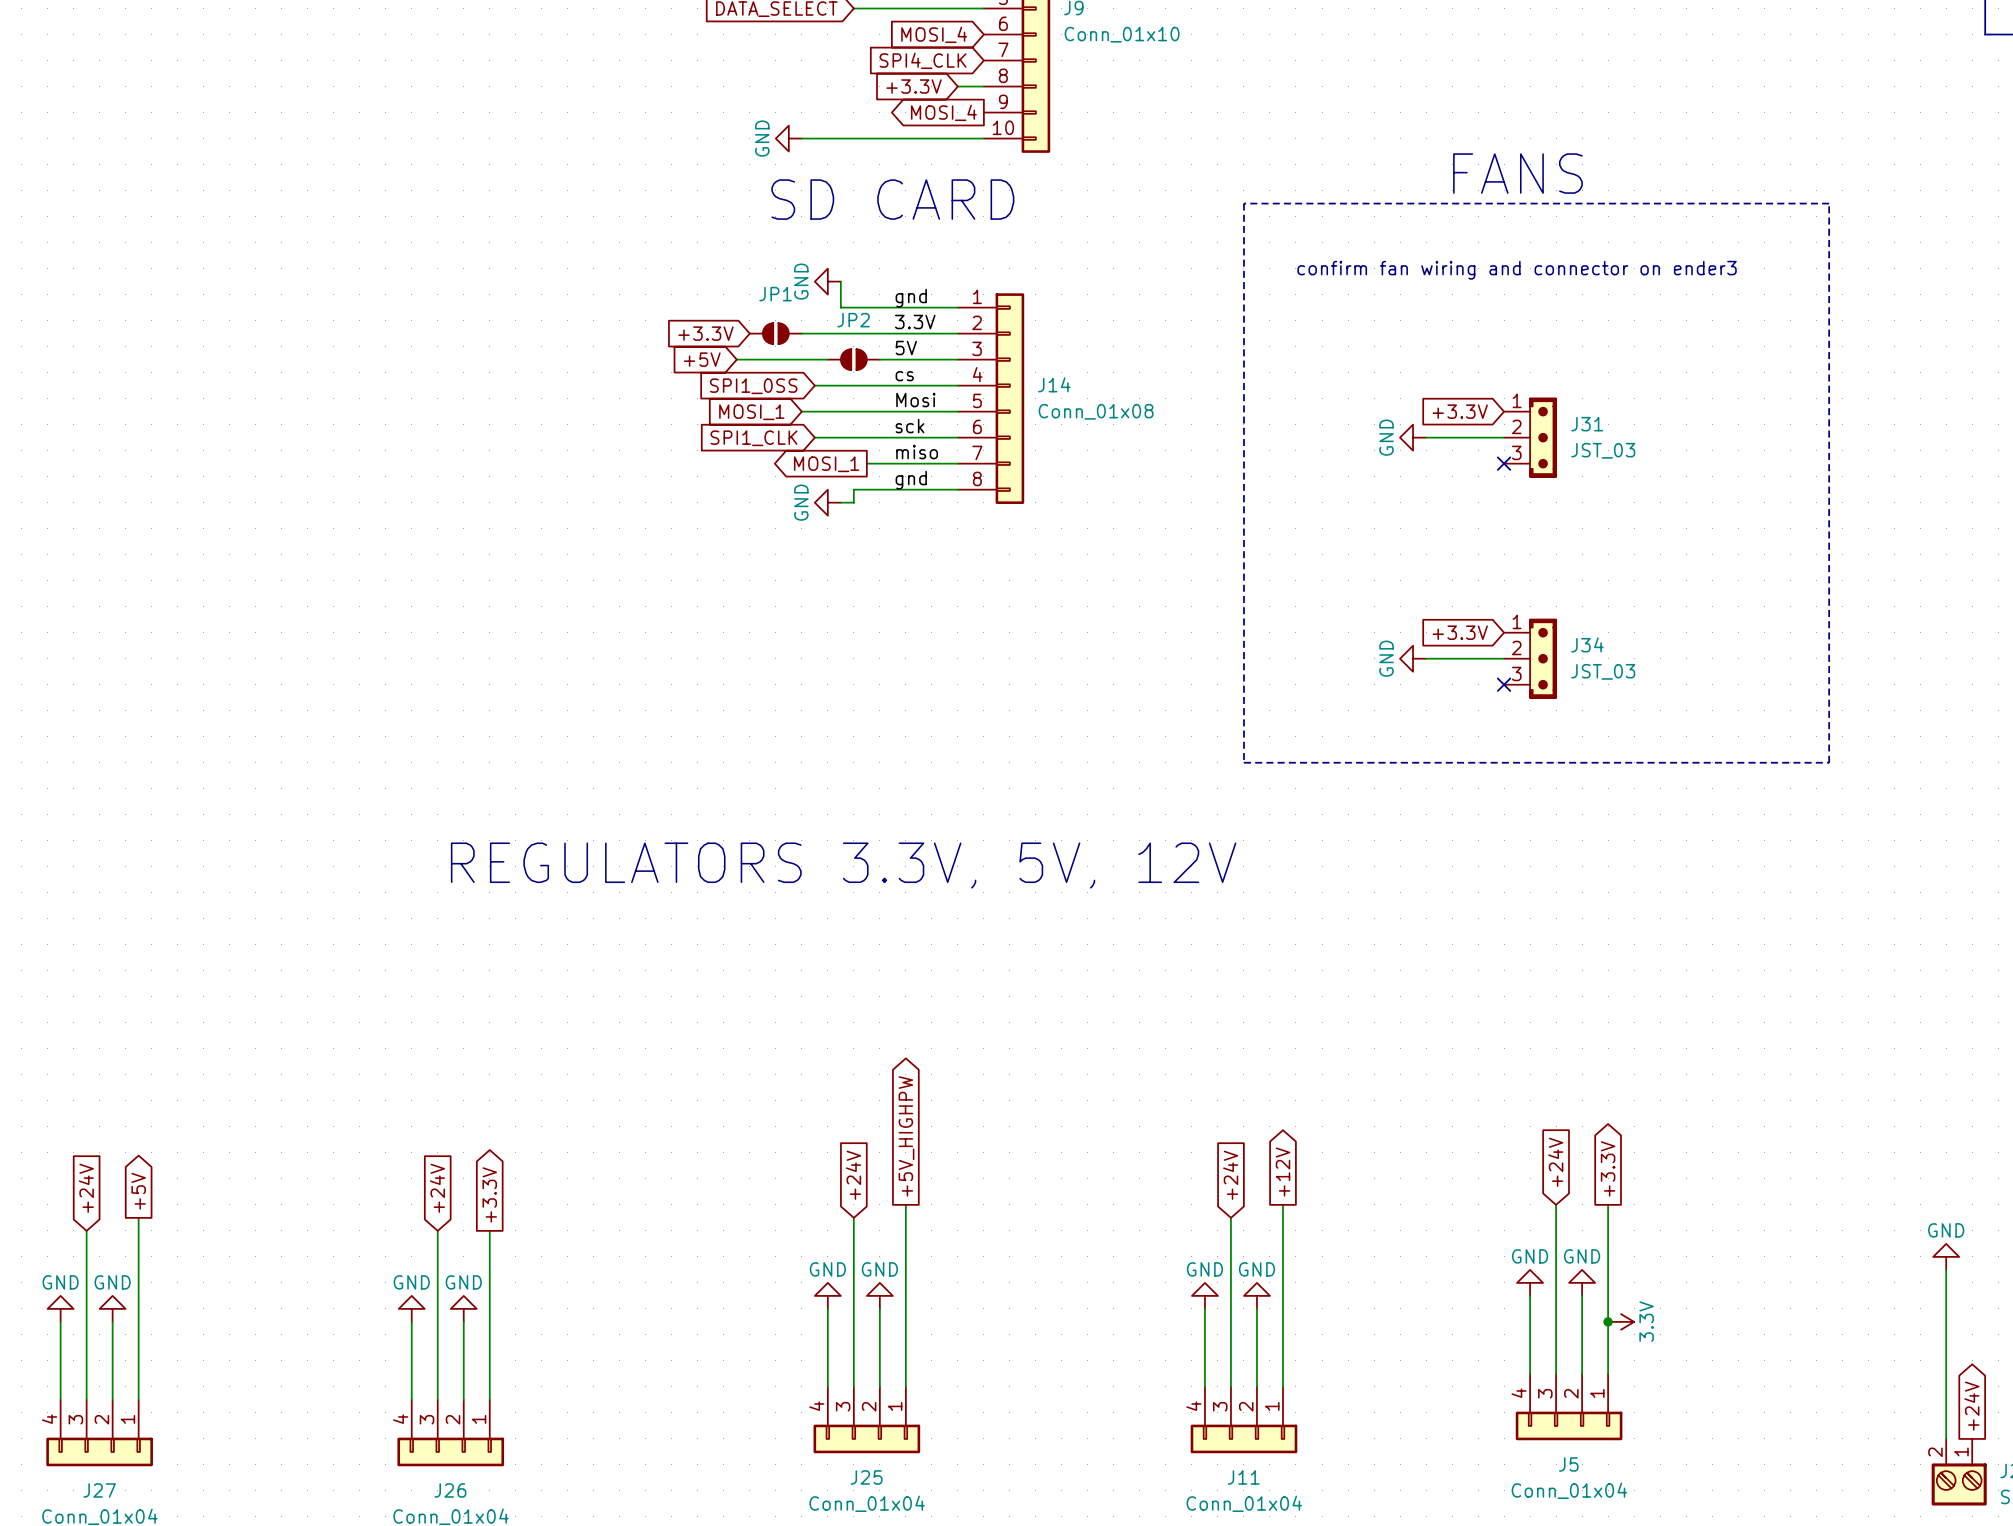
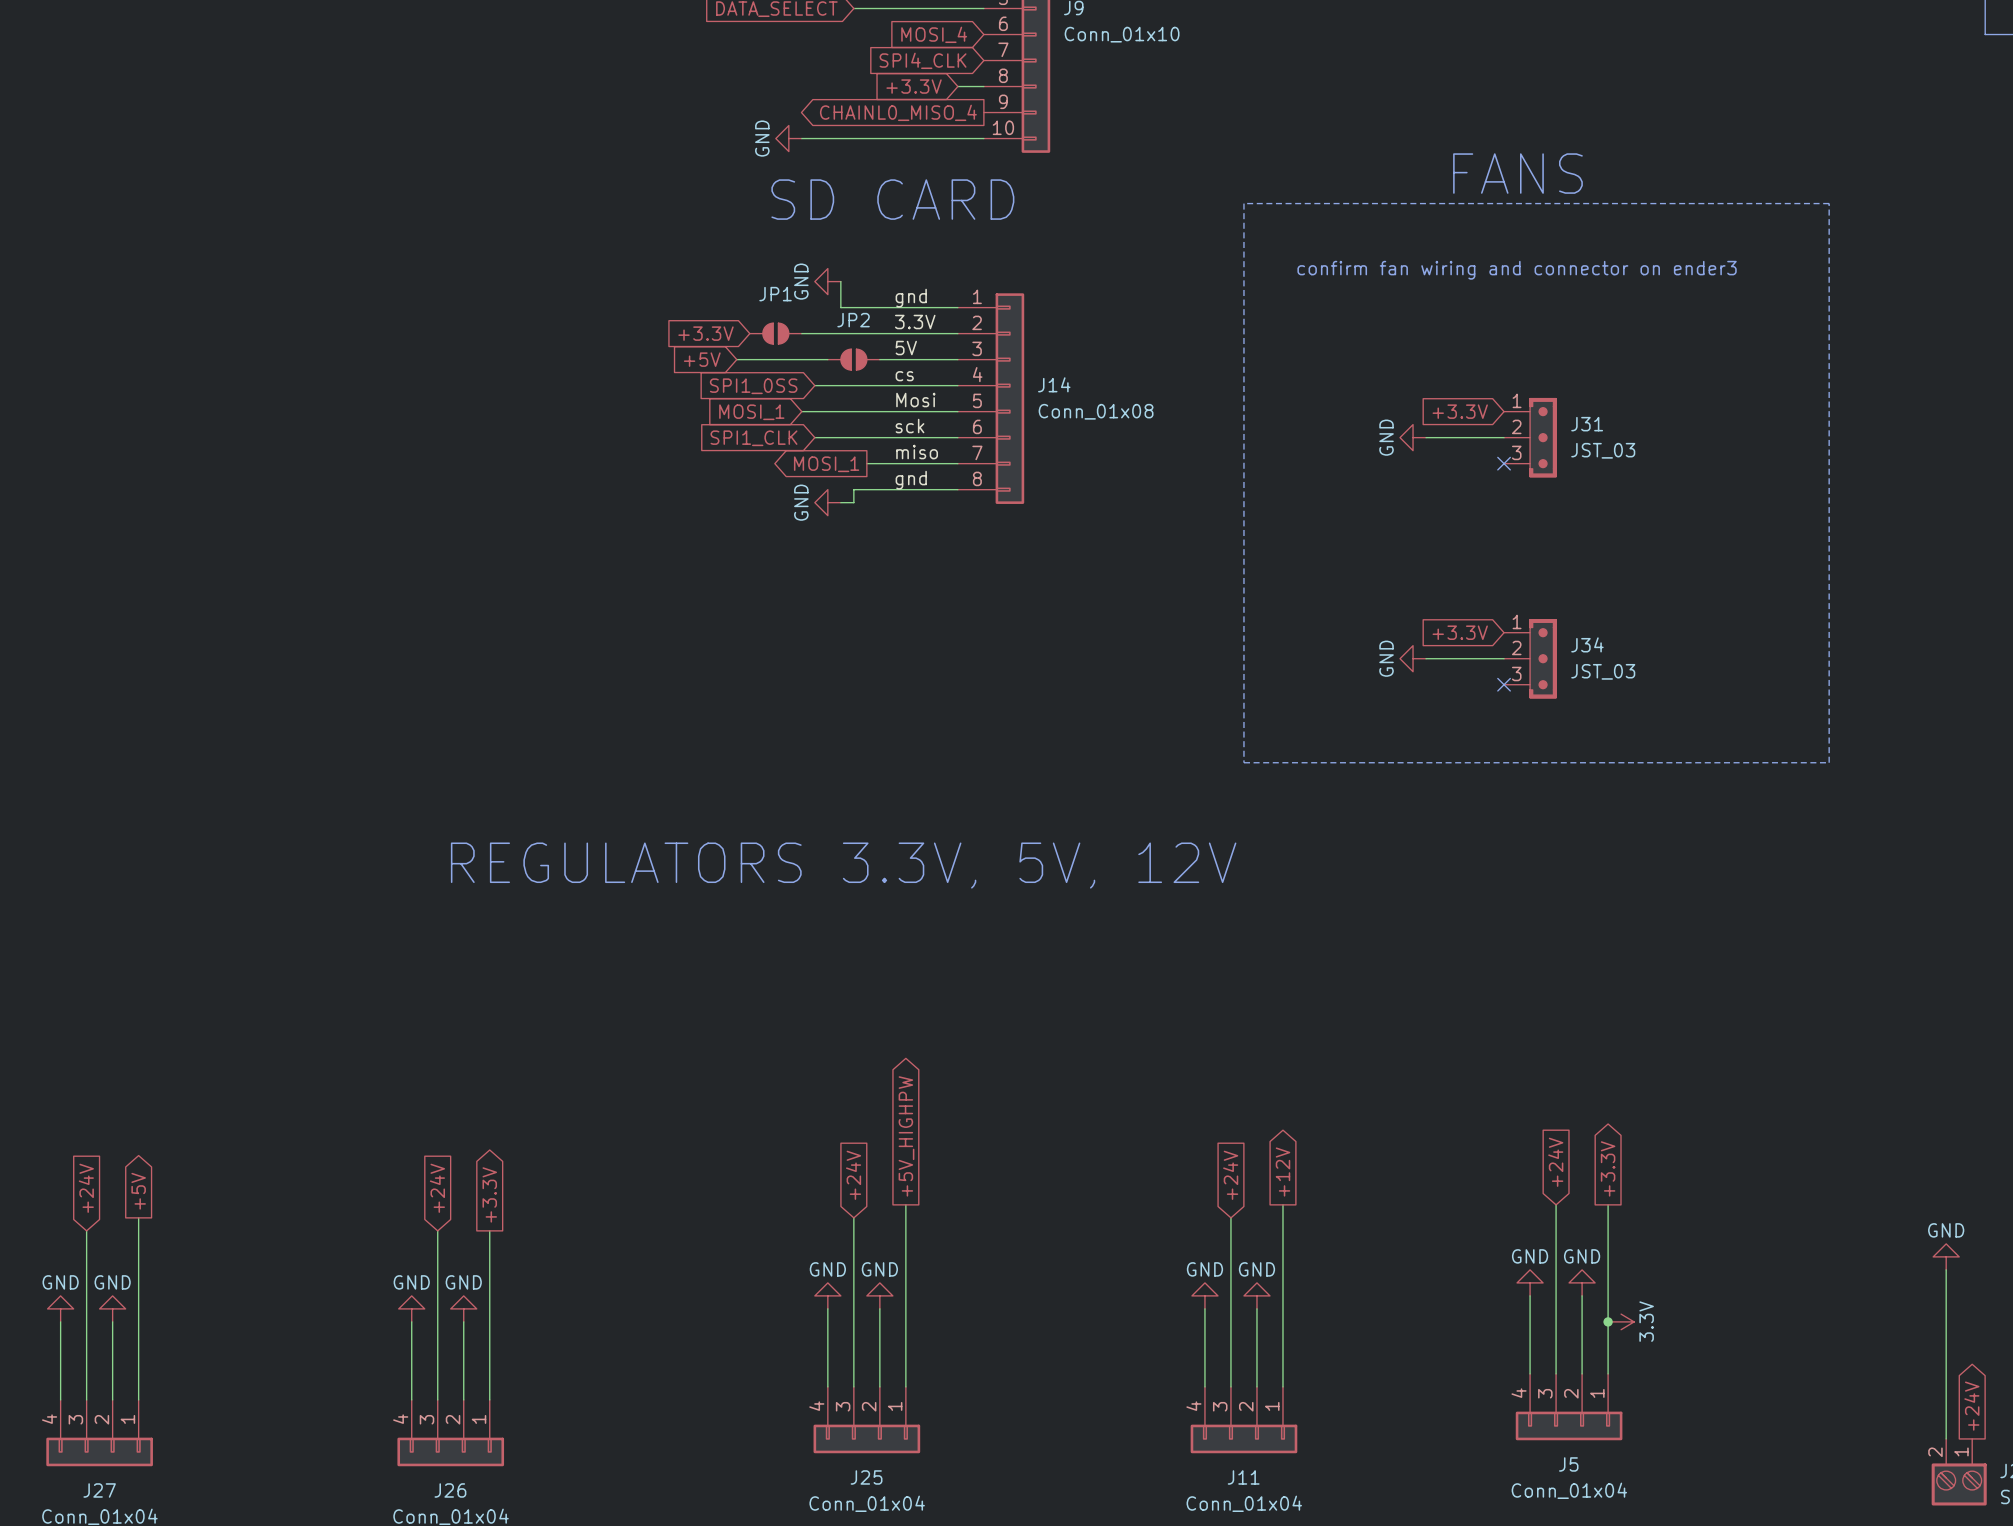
global label: MOSI_4 (943, 112) -> CHAINL0_MISO_4 (898, 112)

